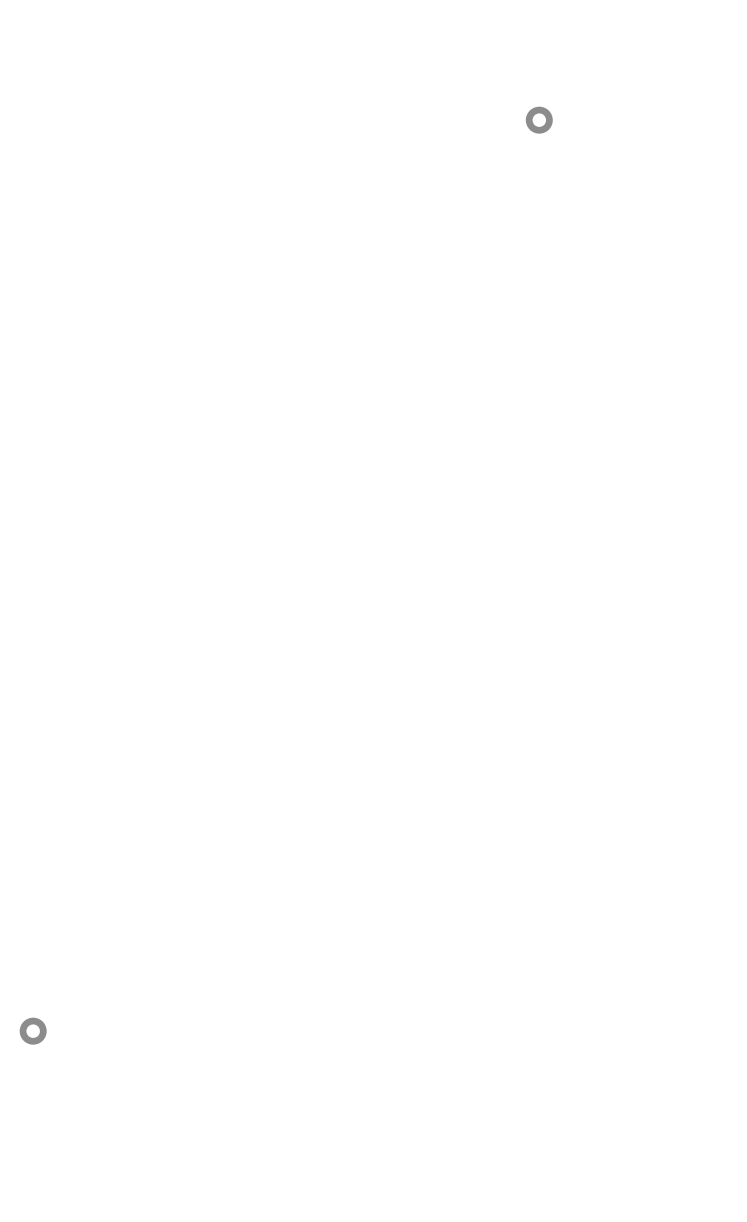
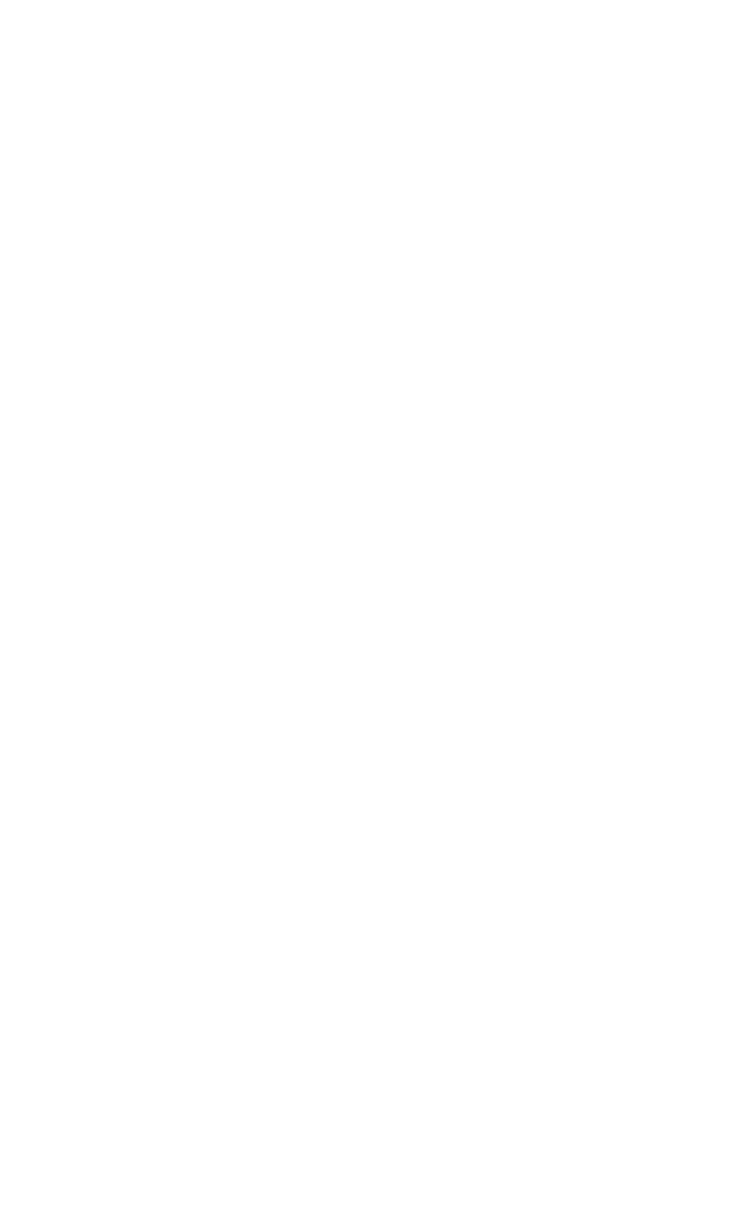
via: (539, 120) -> none
via: (33, 1031) -> none

